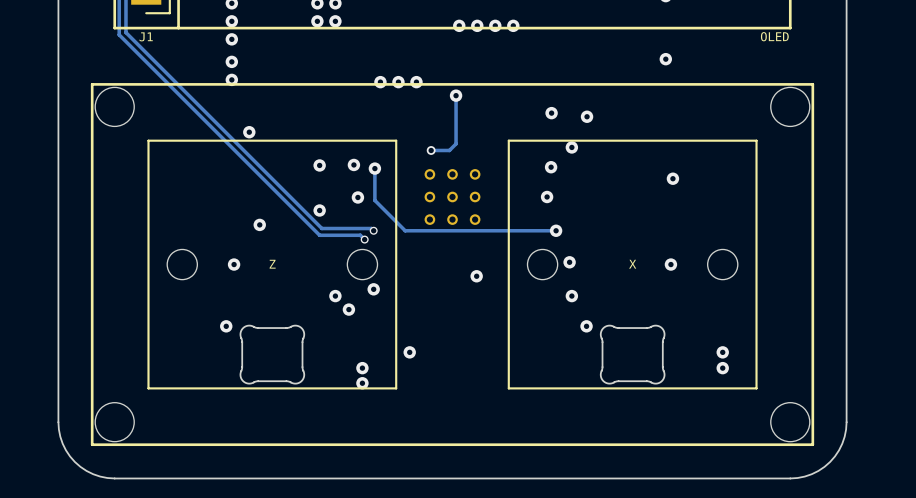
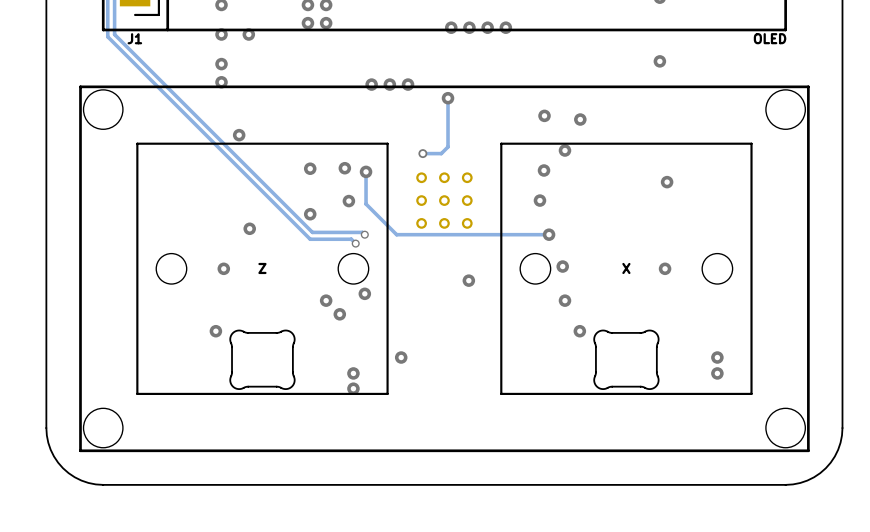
via: (231, 21) -> none
via: none -> (221, 34)
via: none -> (248, 34)
via: (231, 39) -> none

